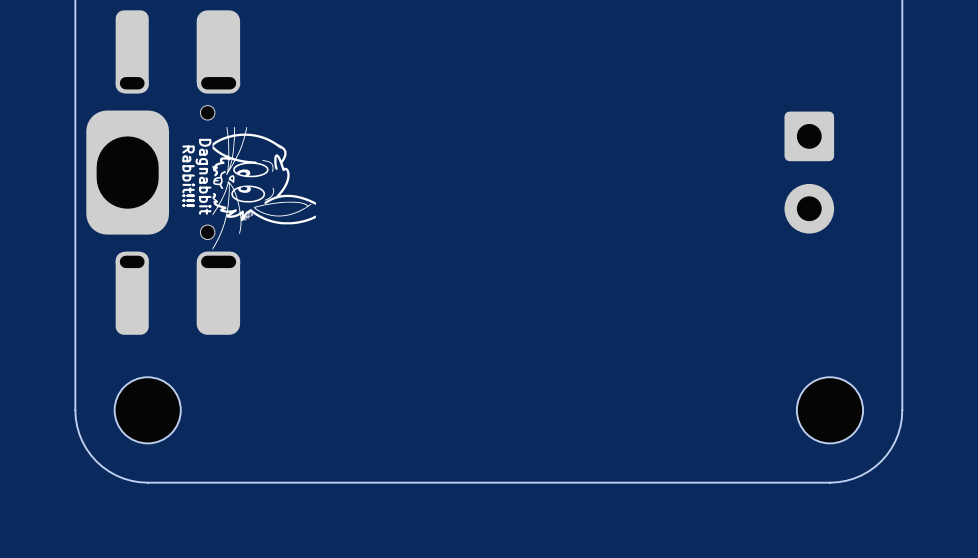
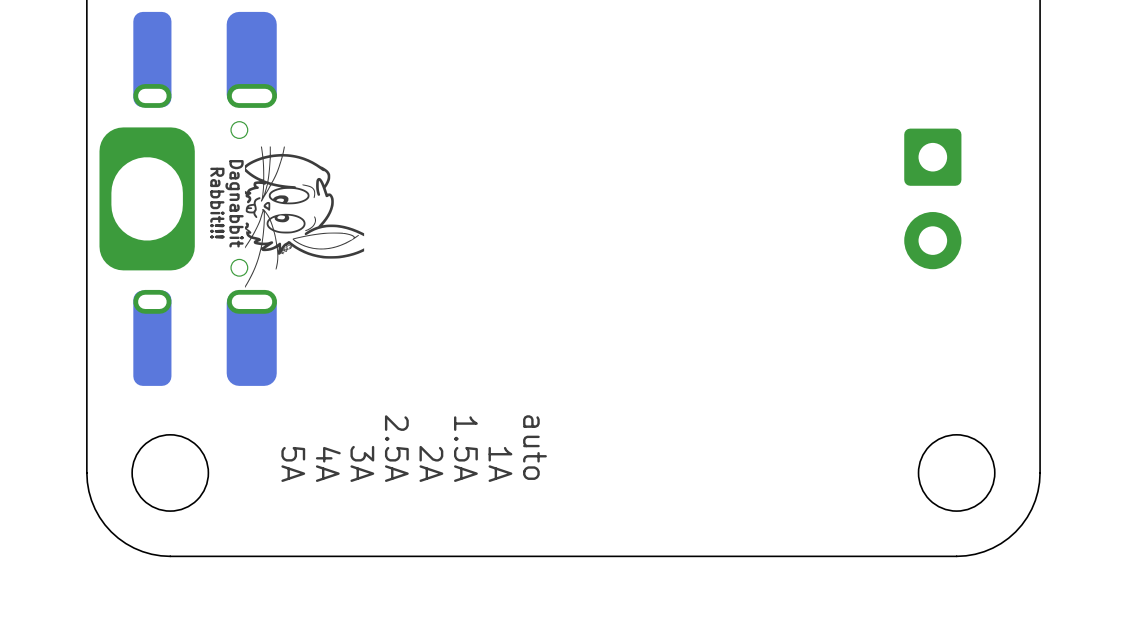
text: none -> auto (534, 447)
text: none -> 2.5A (396, 448)
text: none -> 1.5A (465, 449)
text: none -> 5A (293, 464)
text: none -> 4A (328, 464)
text: none -> 3A (362, 463)
text: none -> 2A (431, 463)
text: none -> 1A (500, 464)

